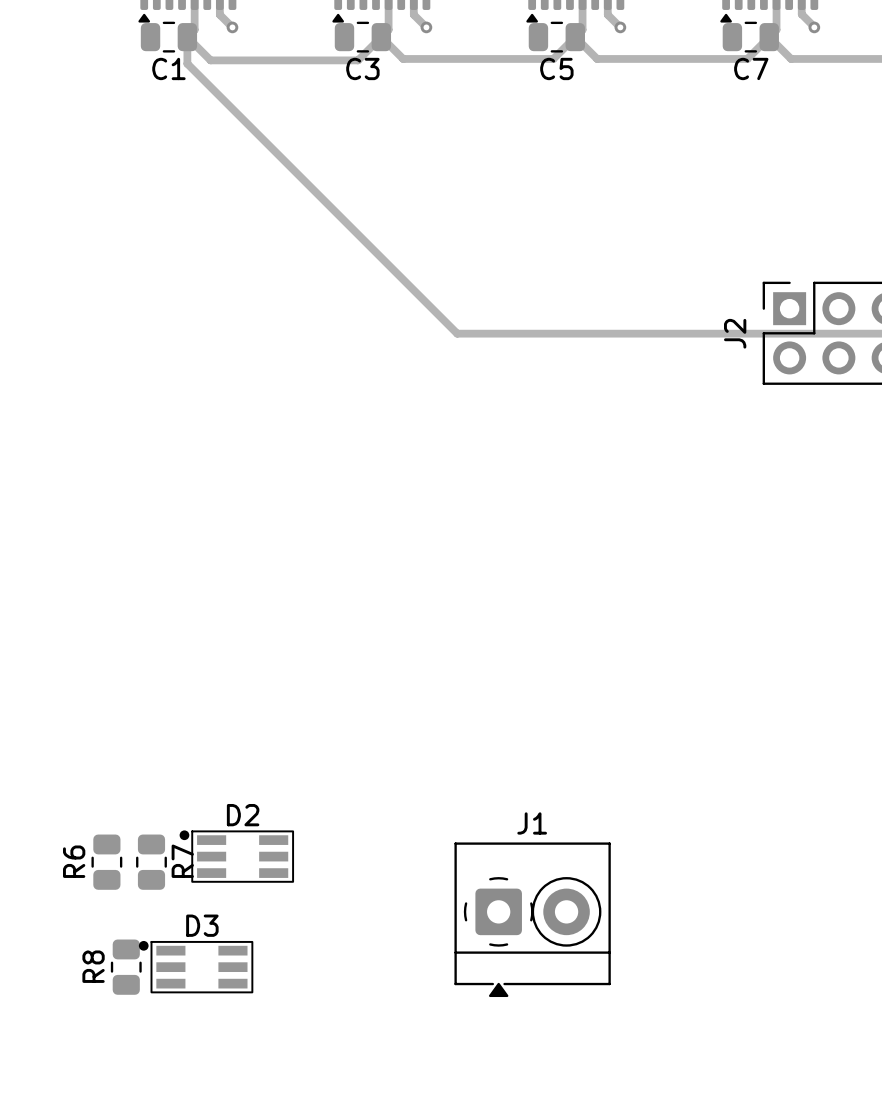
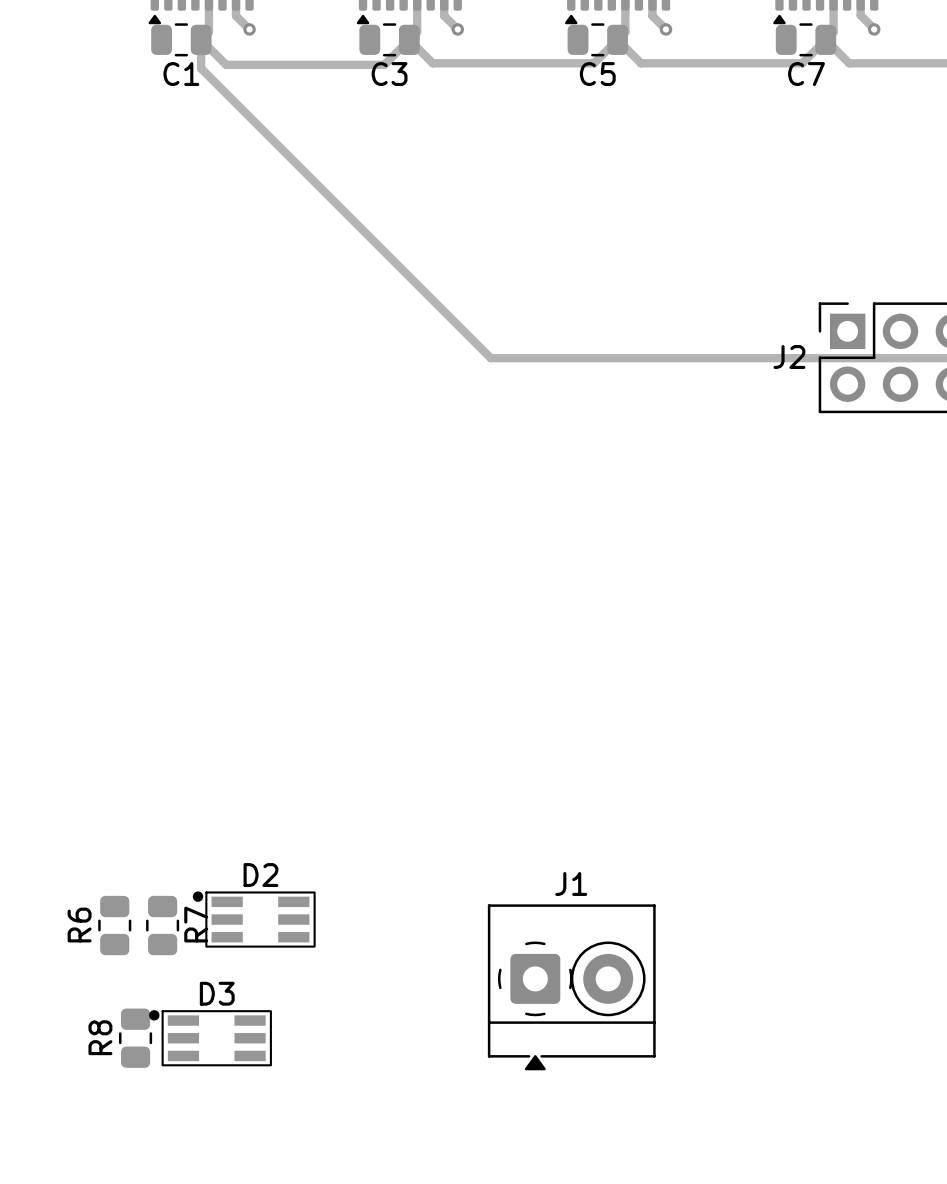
J2 name rotation: 0° (735, 333) -> 90° clockwise (789, 357)

